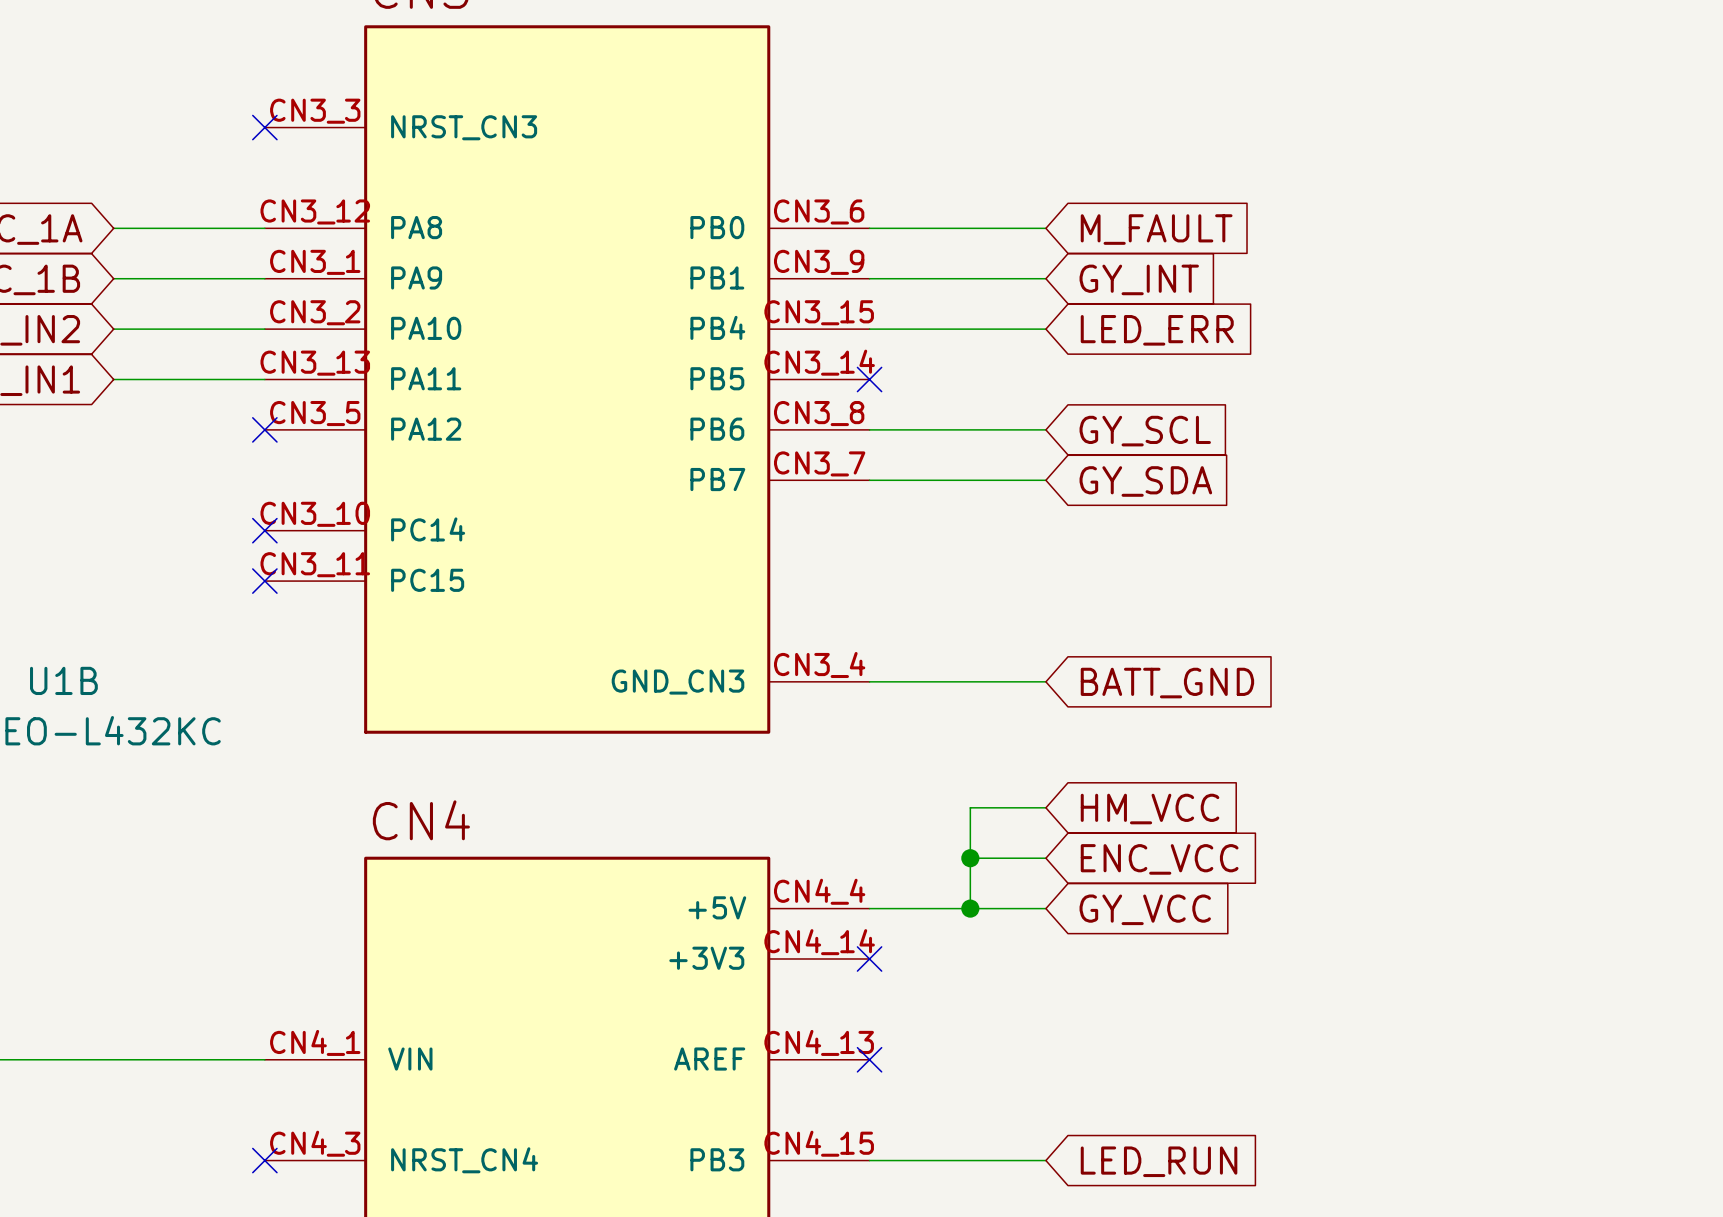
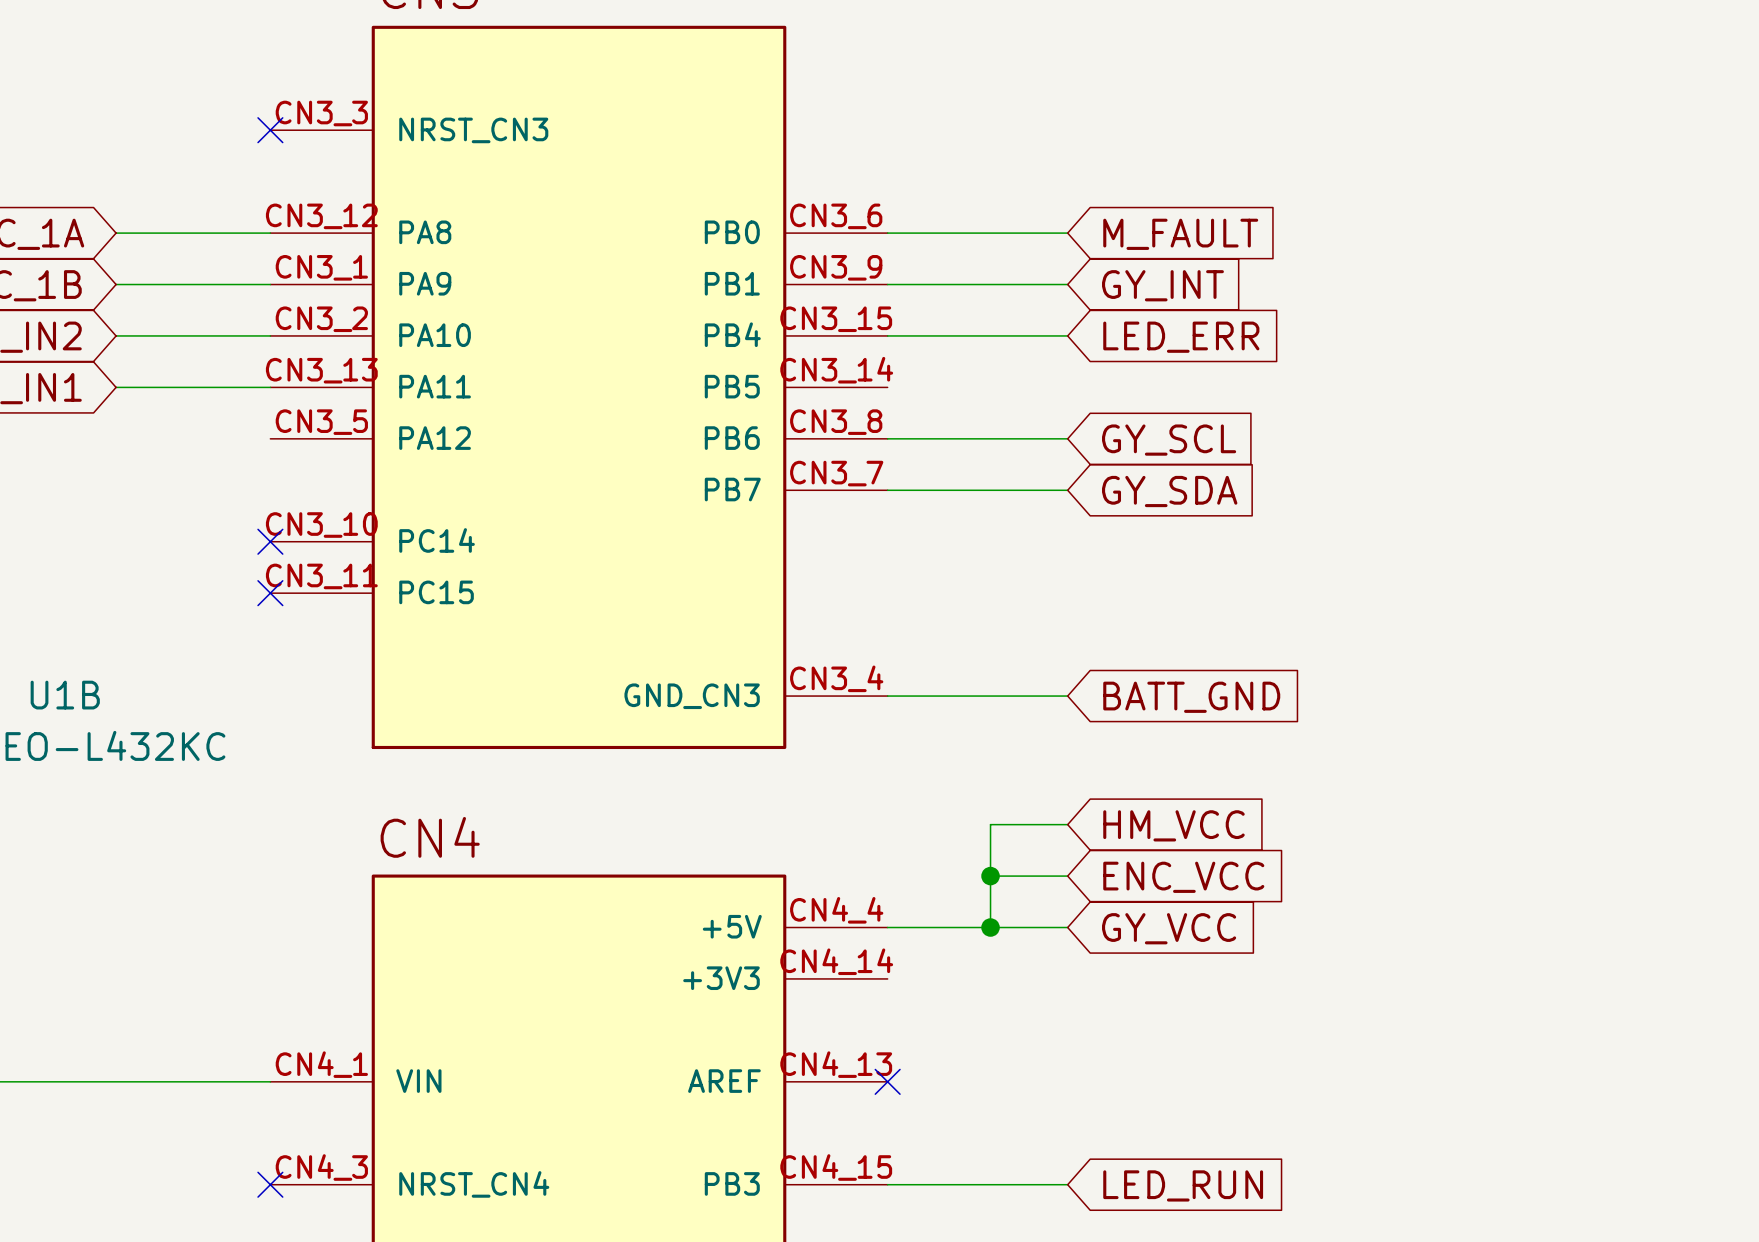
no-connect mark: (869, 379) -> none
no-connect mark: (264, 429) -> none
no-connect mark: (869, 958) -> none

